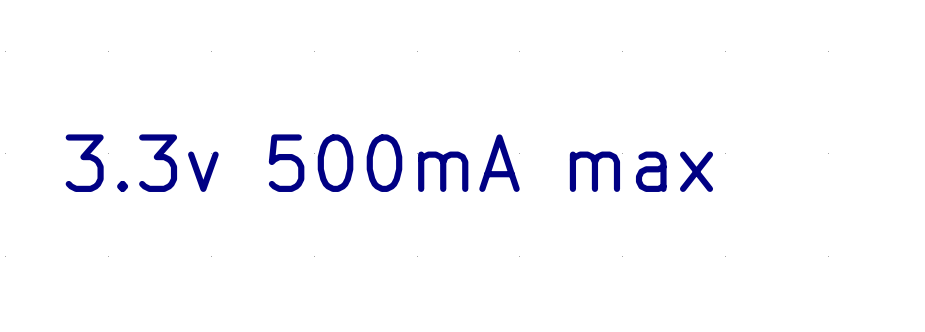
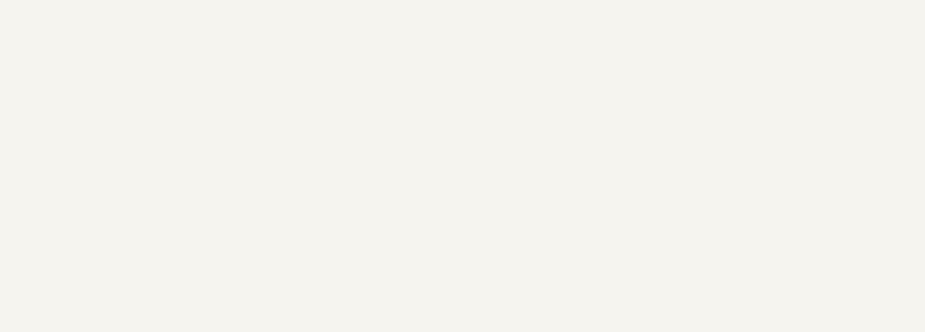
text: 3.3v 500mA max (389, 163) -> none

